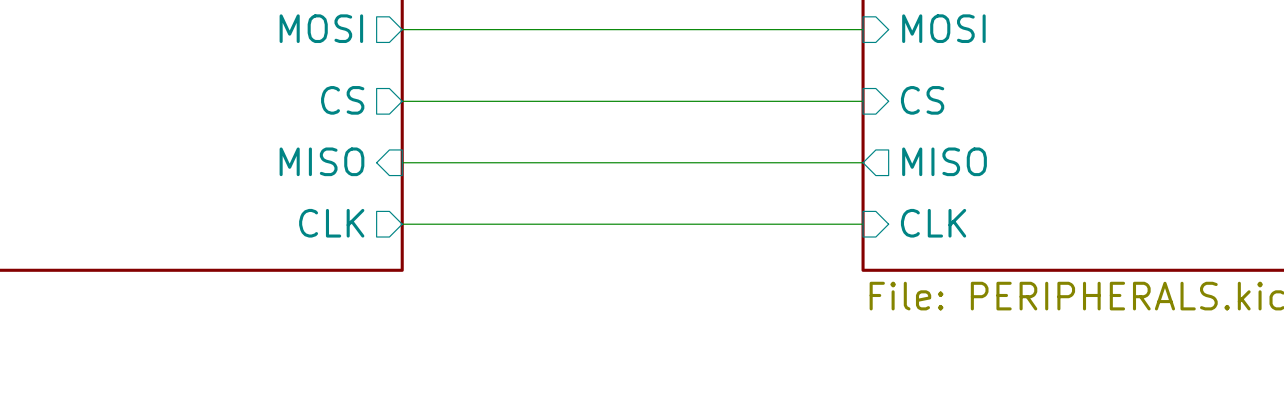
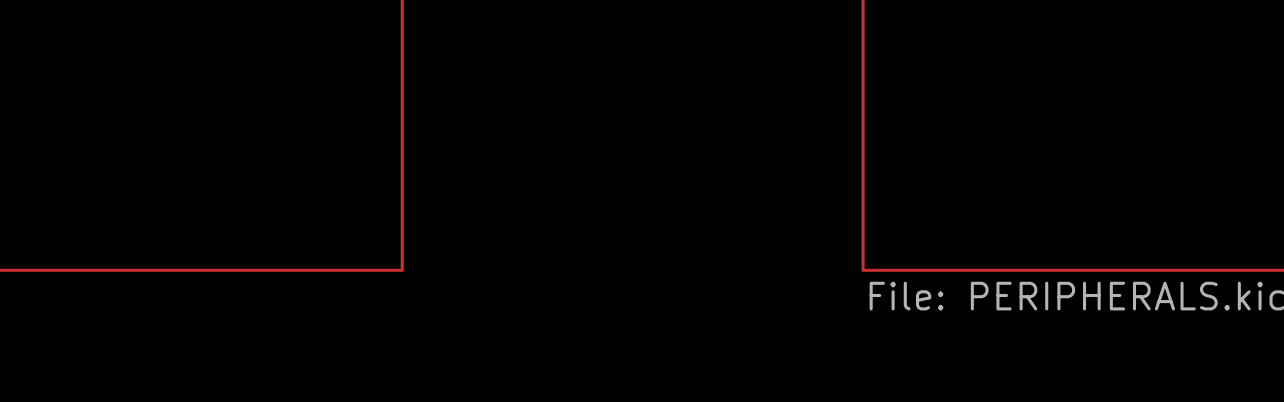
sheet pin: MOSI (321, 28) -> none
sheet pin: MOSI (943, 28) -> none
wire: (402, 29) (863, 29) -> none
sheet pin: CS (342, 100) -> none
sheet pin: CS (922, 100) -> none
wire: (402, 101) (863, 101) -> none
sheet pin: MISO (321, 161) -> none
sheet pin: MISO (944, 161) -> none
wire: (402, 162) (863, 162) -> none
sheet pin: CLK (331, 223) -> none
sheet pin: CLK (933, 223) -> none
wire: (402, 224) (863, 224) -> none

